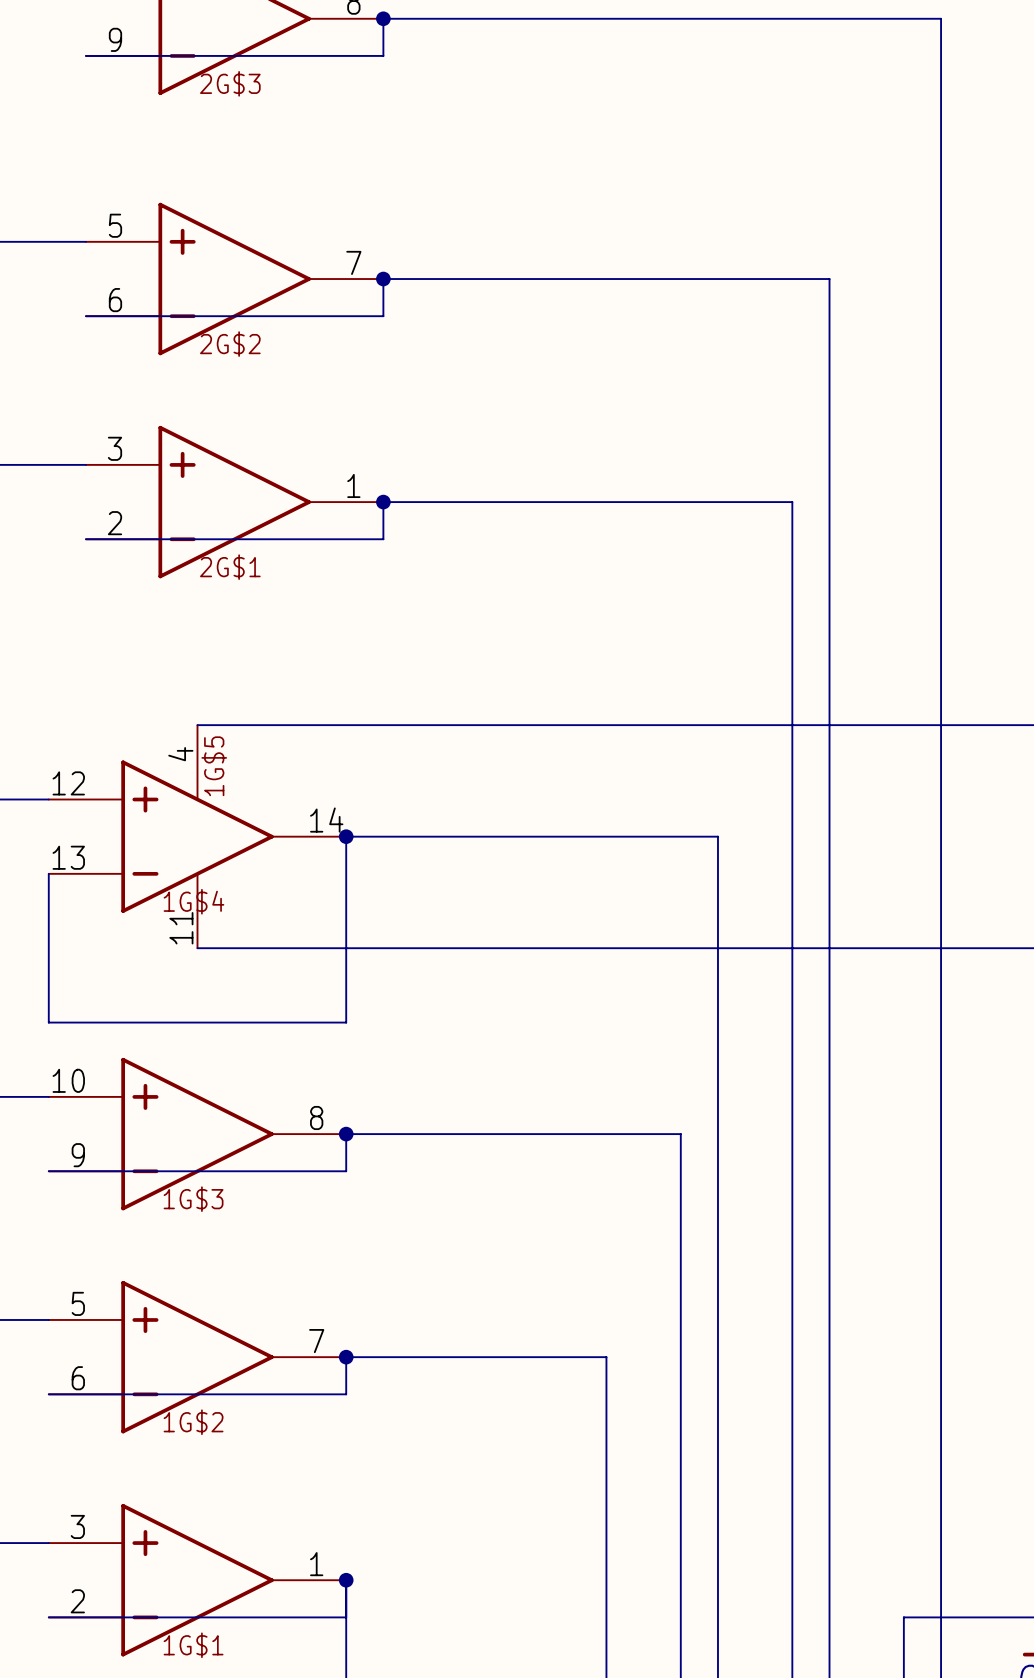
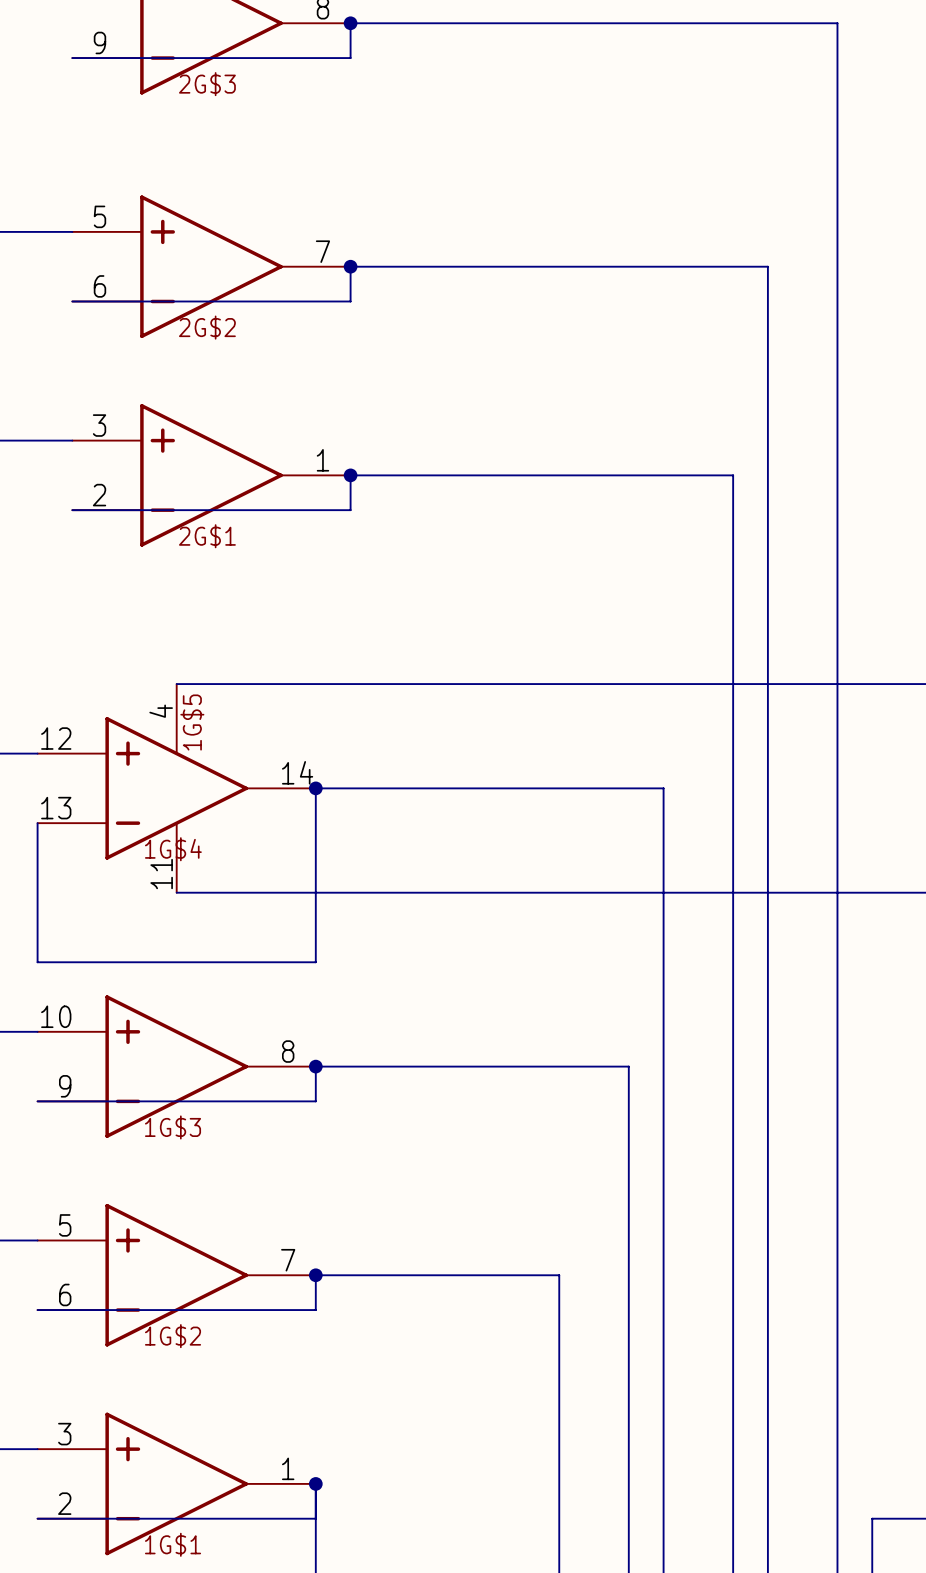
wire: (903, 18) (941, 18) (941, 1617) (903, 1617) -> (837, 23) (837, 1518)

